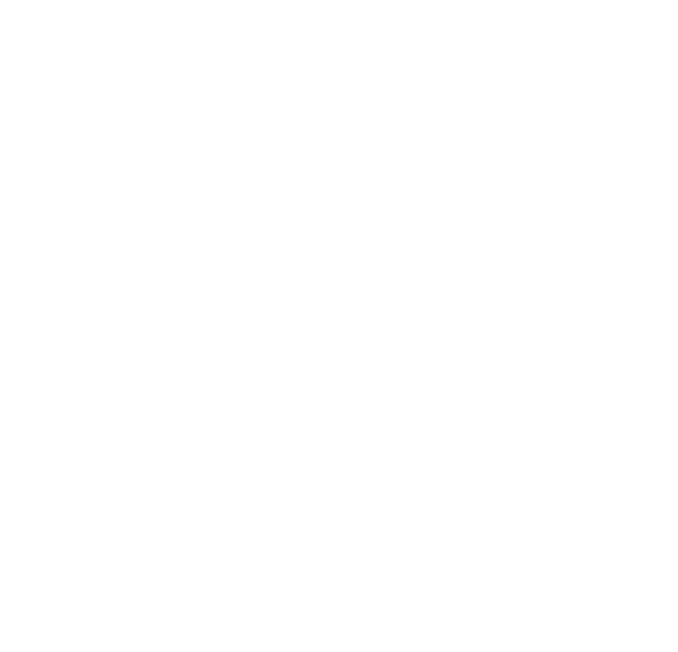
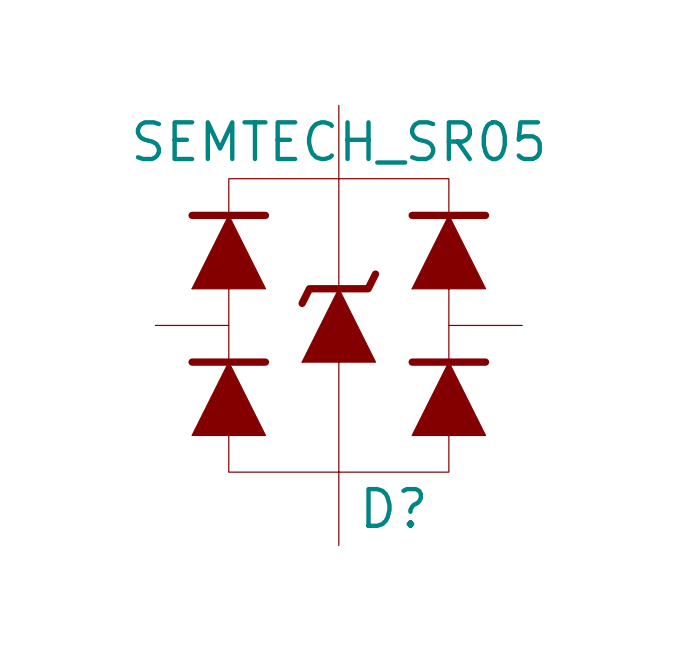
D?: none -> SEMTECH_SR05 (338, 325)

